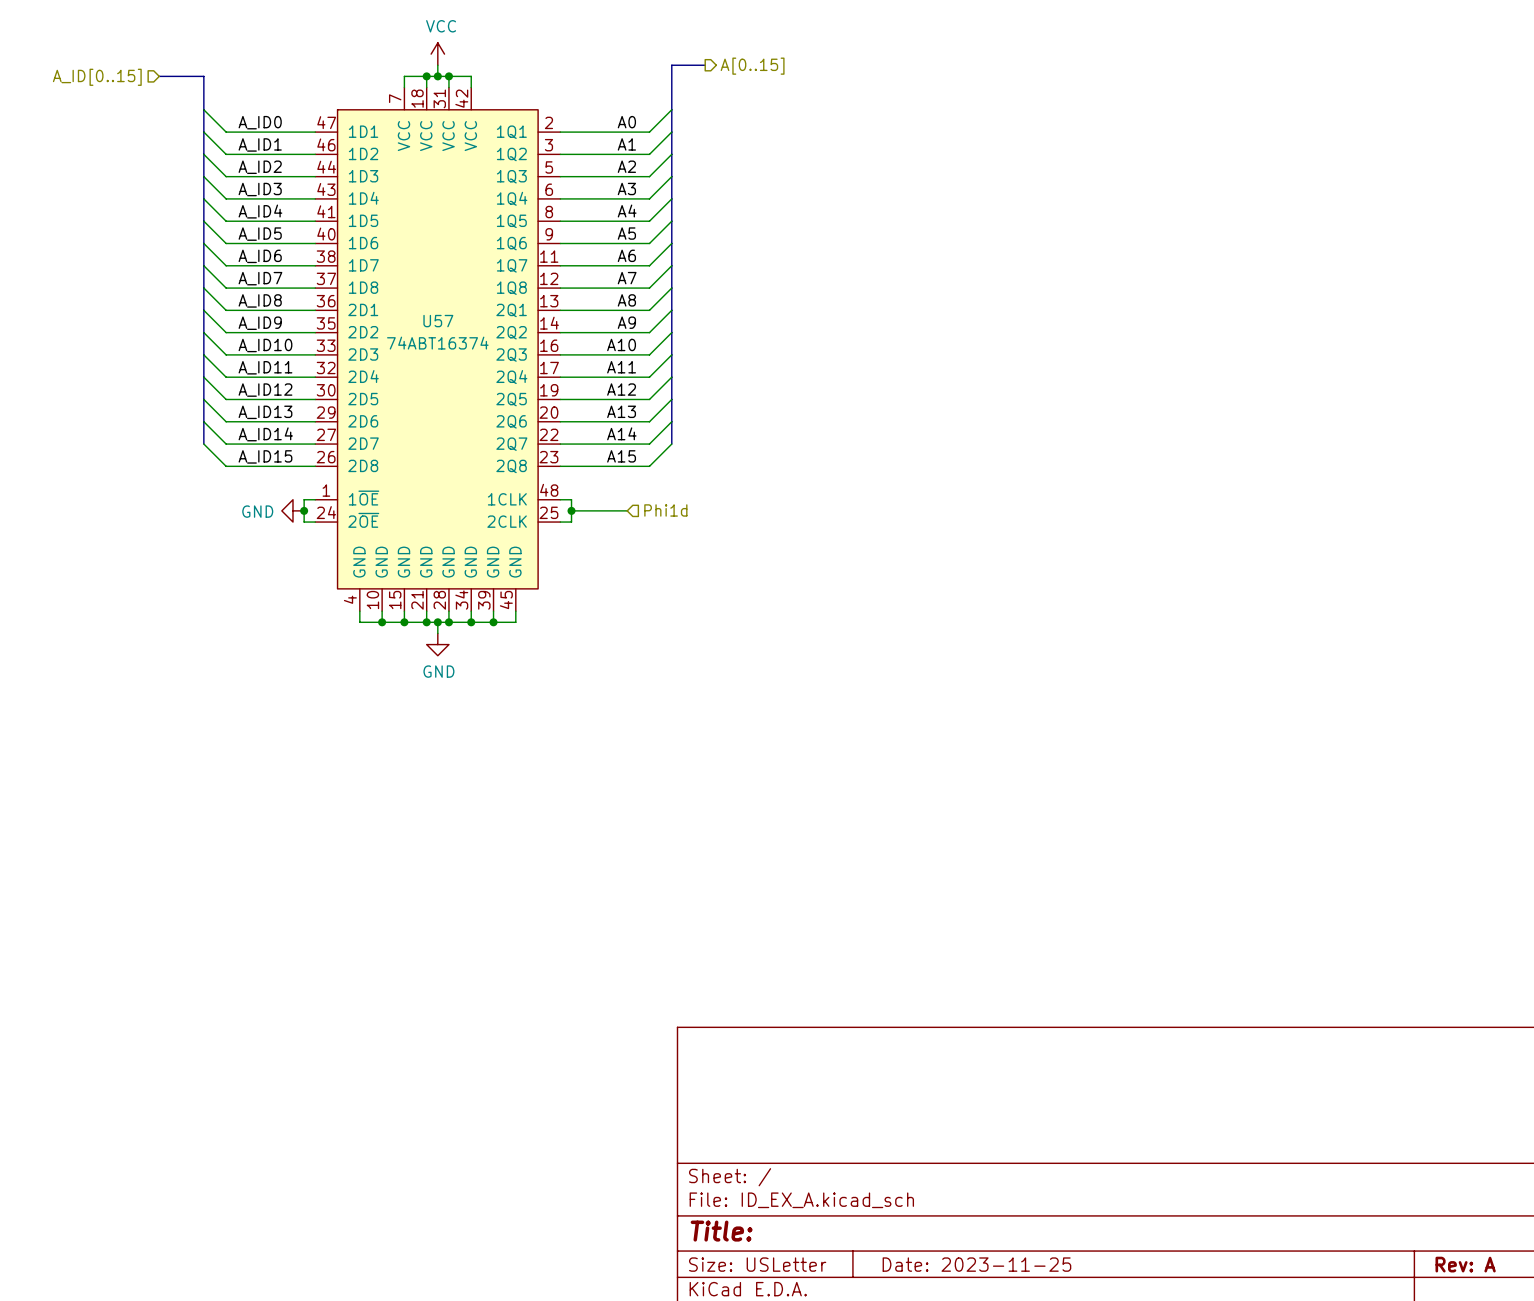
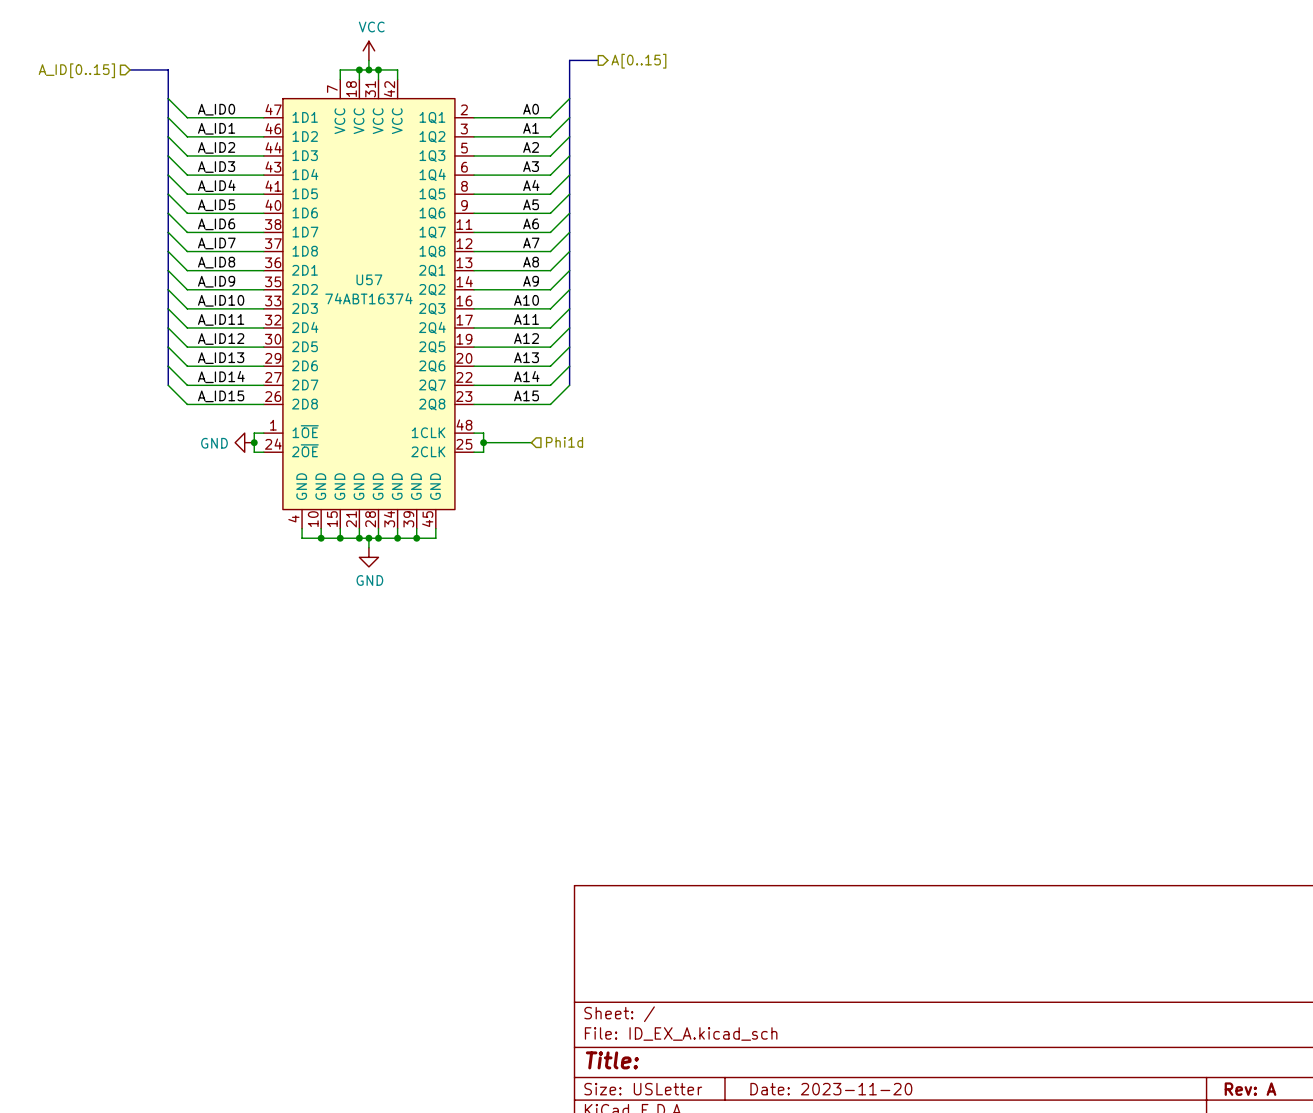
title block: Date: 2023-11-25 (976, 1264) -> Date: 2023-11-20 (831, 1089)

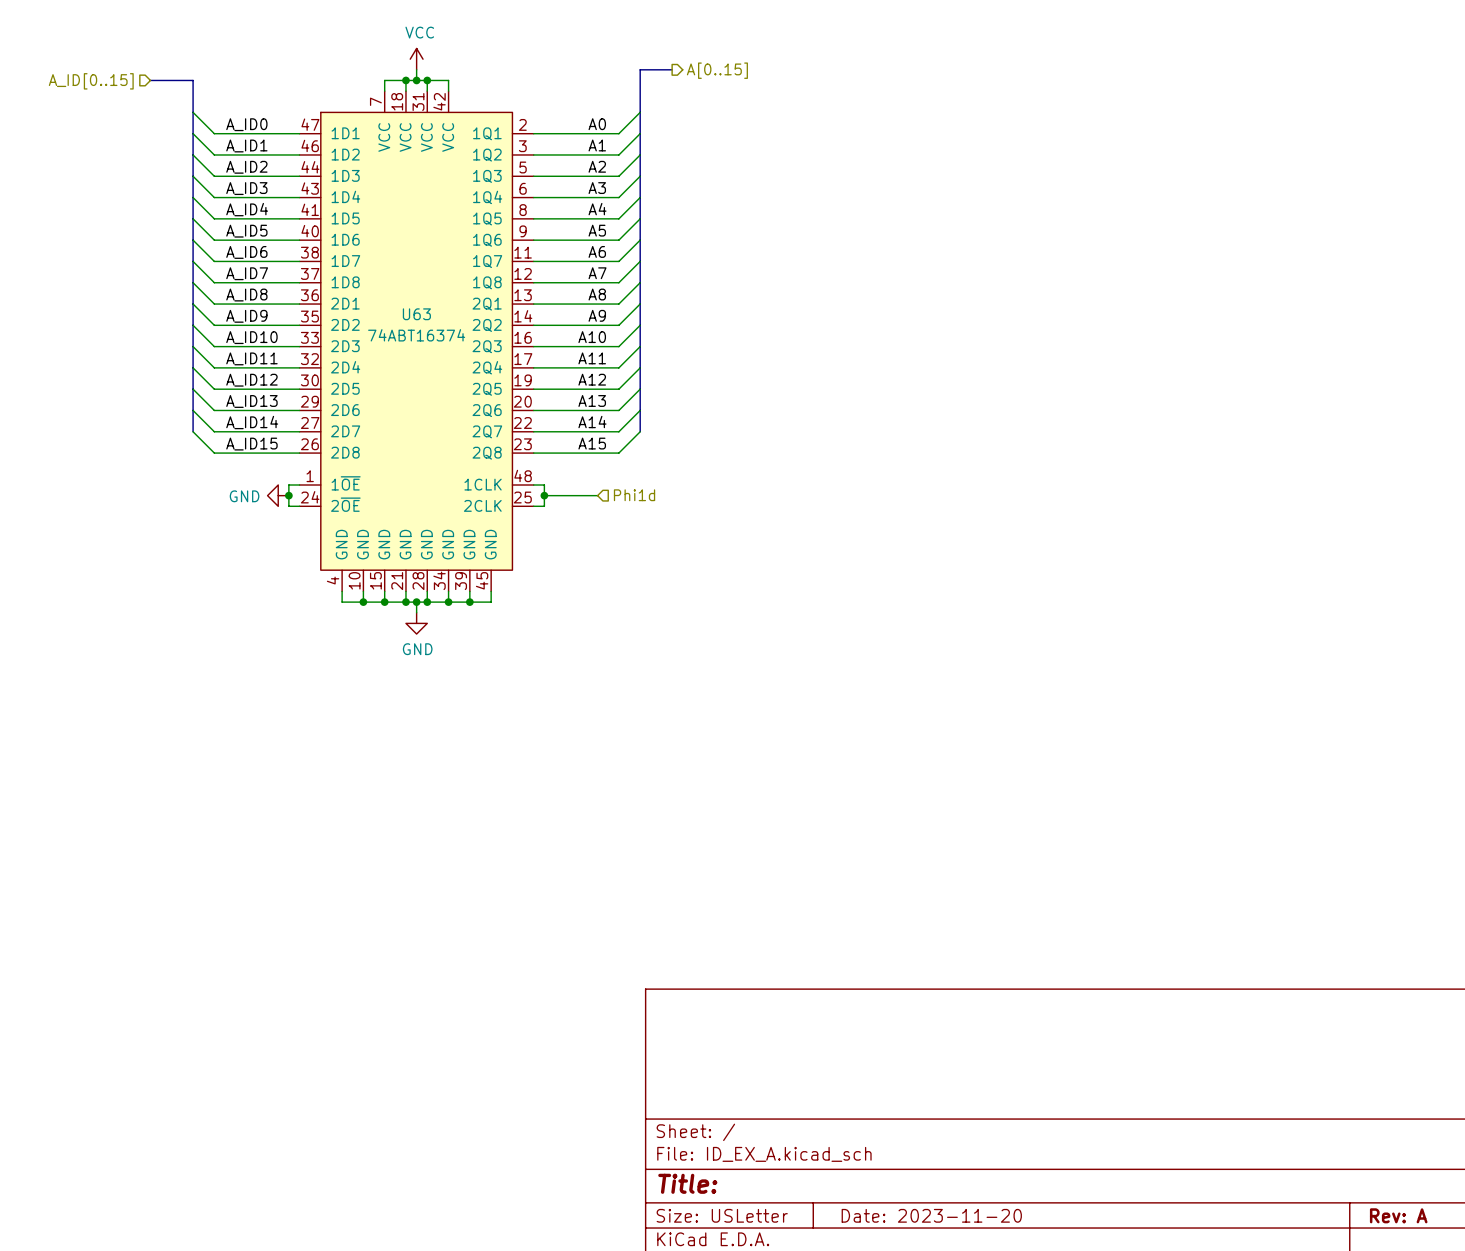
U57 name: U57 (369, 279) -> U63 (416, 314)

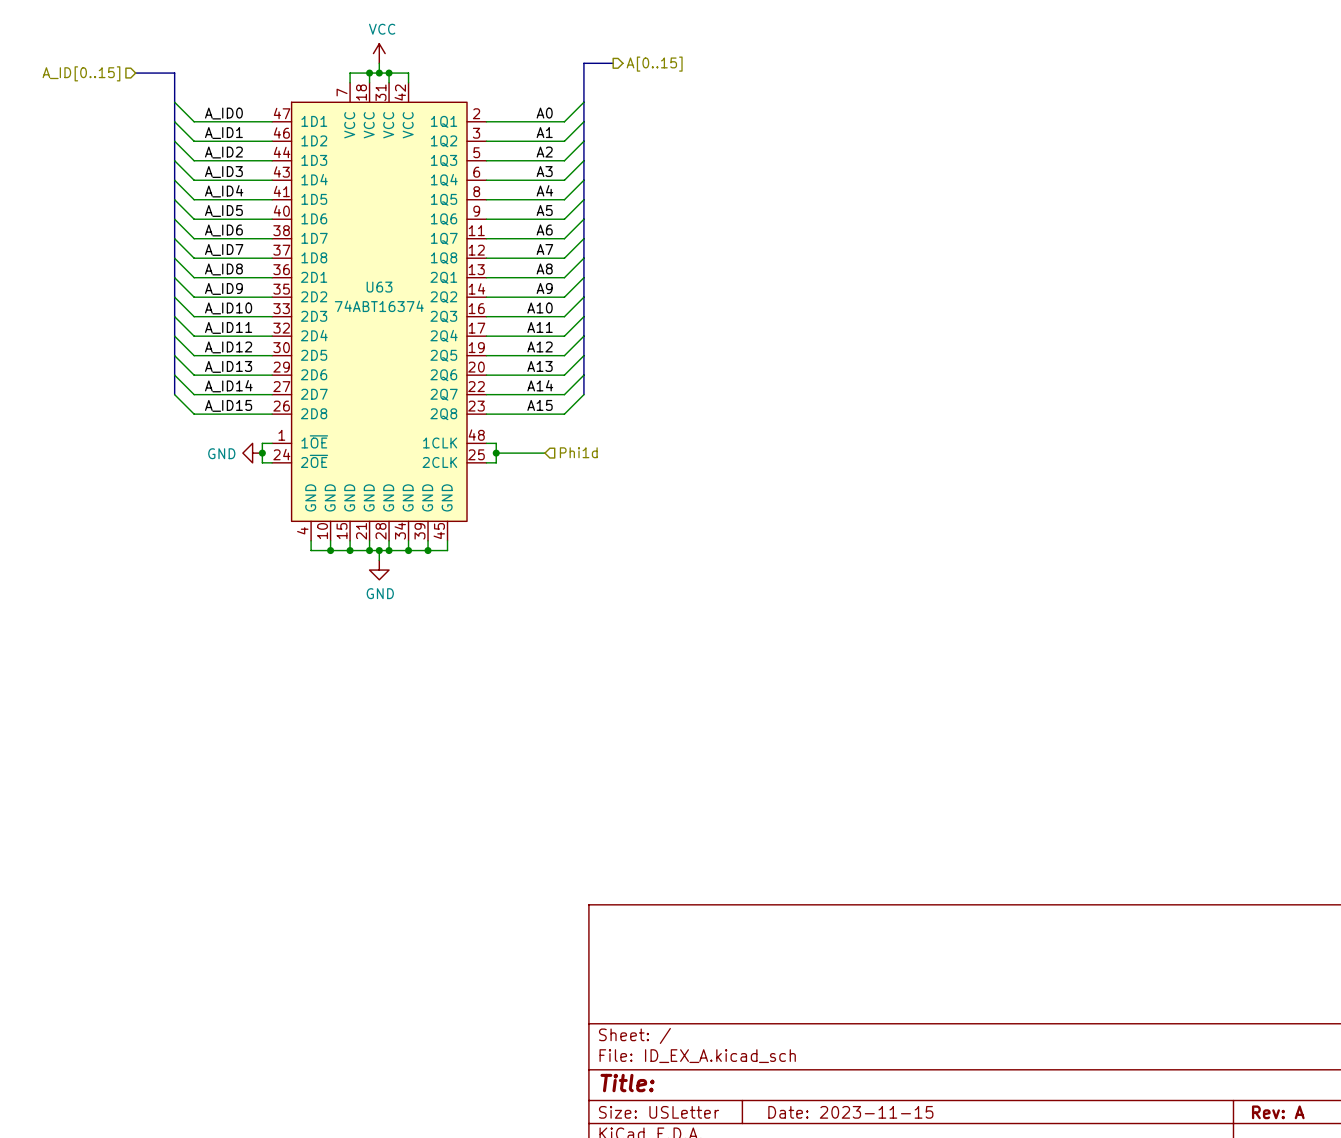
title block: Date: 2023-11-20 (931, 1215) -> Date: 2023-11-15 (850, 1112)

